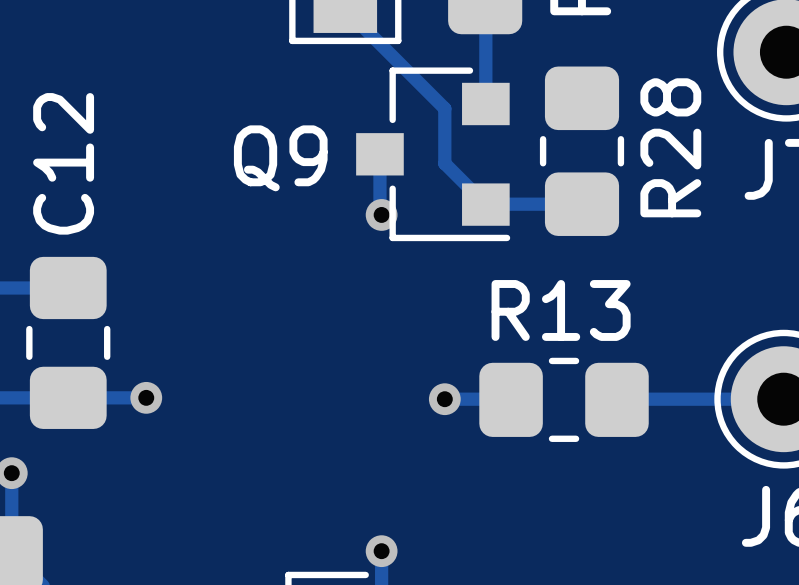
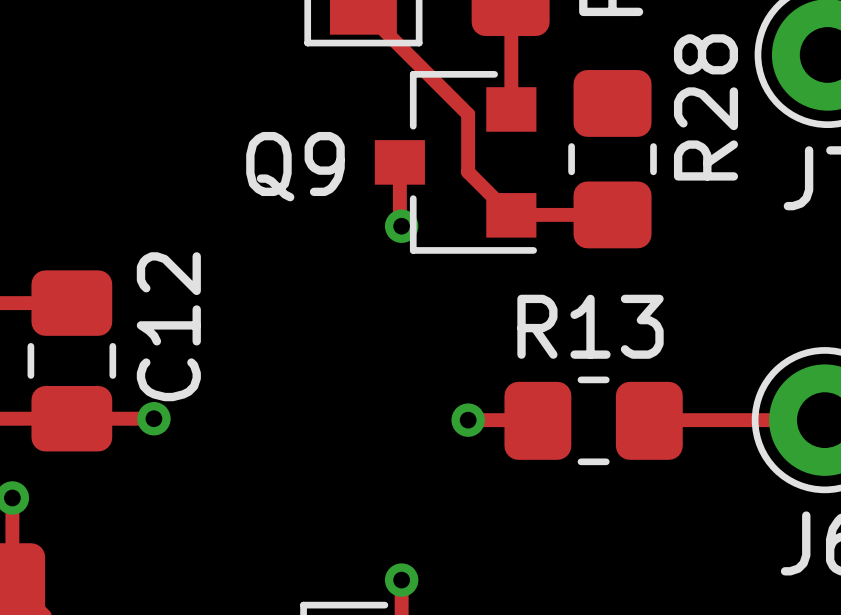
R28 name position: R28 (670, 147) -> R28 (705, 107)
C12 name position: C12 (63, 163) -> C12 (168, 326)

